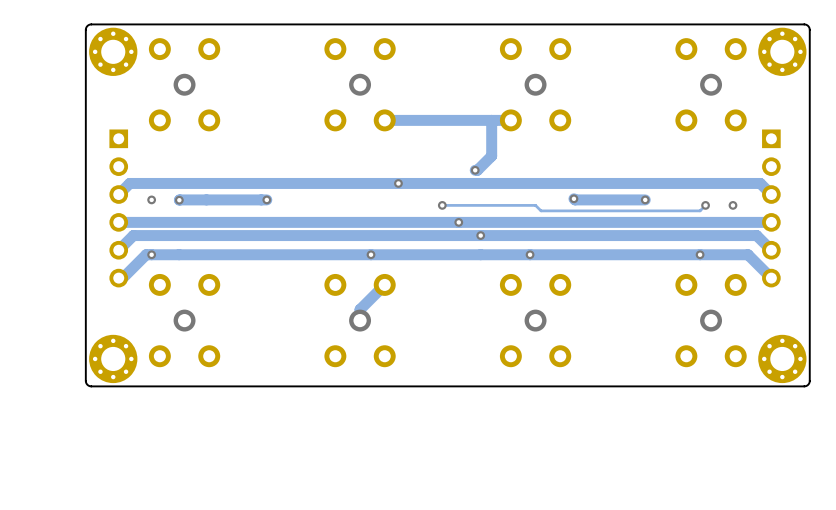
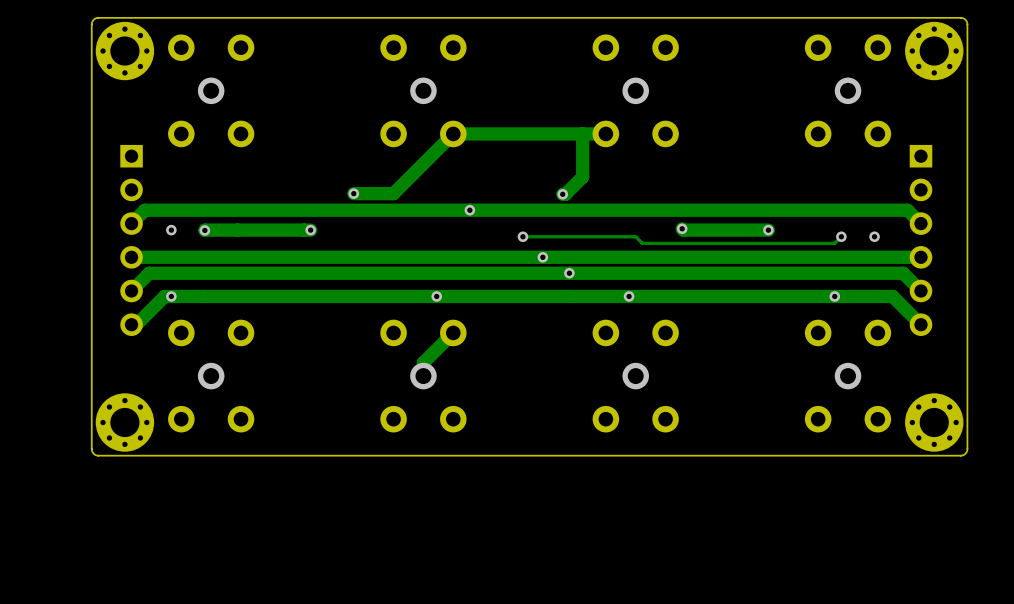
track: none -> (453, 133) (393, 193) (353, 193)
via: none -> (353, 193)

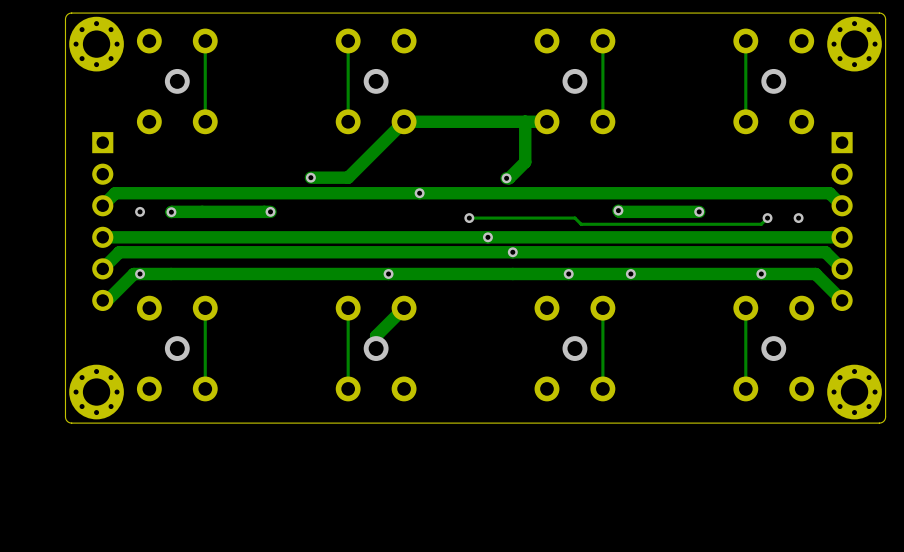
track: none -> (205, 41) (205, 121)
track: none -> (348, 41) (348, 121)
track: none -> (602, 41) (602, 121)
track: none -> (745, 41) (745, 121)
via: none -> (630, 273)
track: none -> (205, 308) (205, 388)
track: none -> (348, 308) (348, 388)
track: none -> (602, 308) (602, 388)
track: none -> (745, 308) (745, 388)

